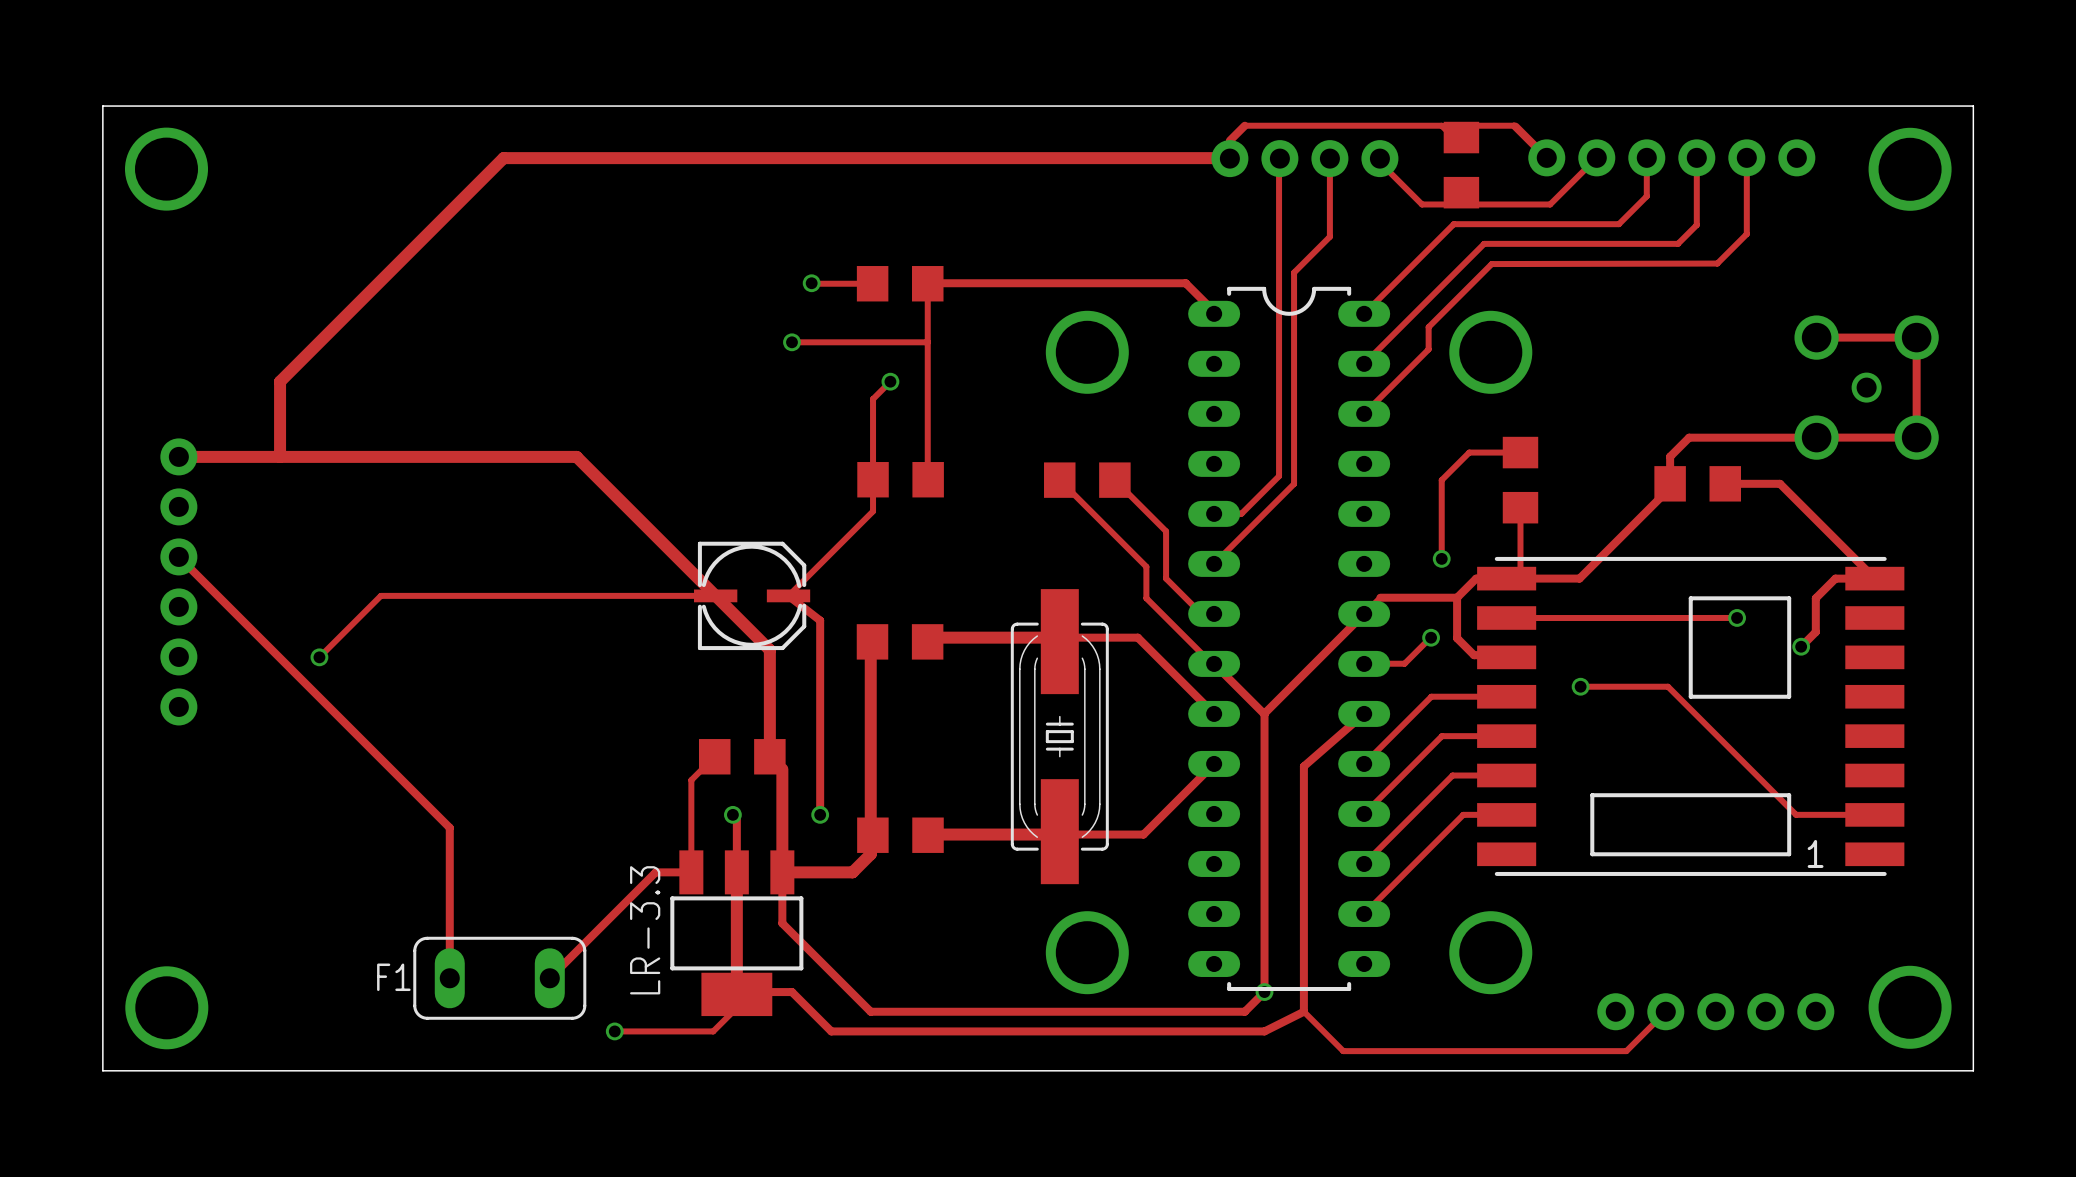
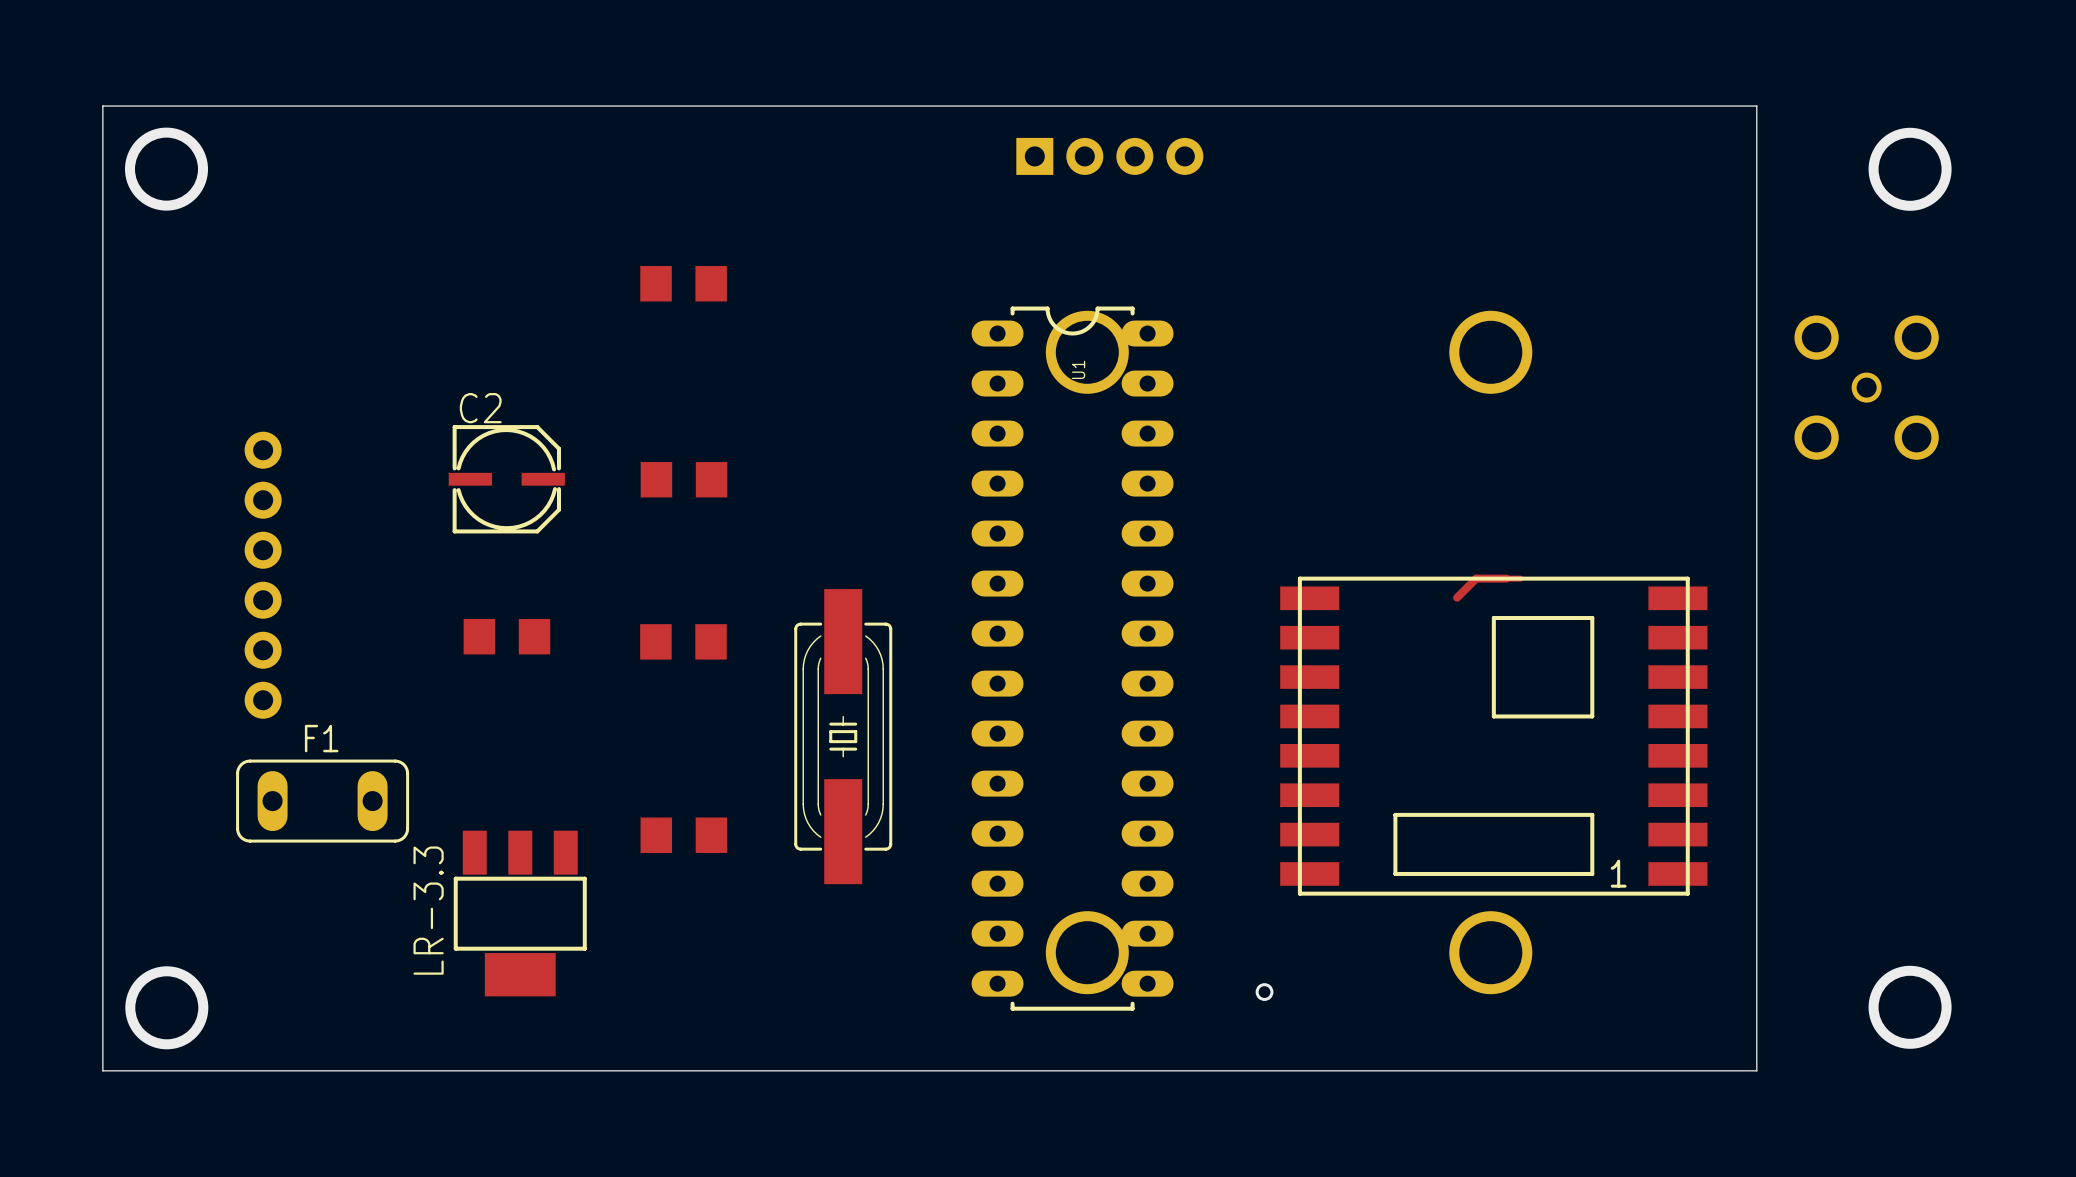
board edge: (1756, 106) (1973, 106) (1973, 1070) (1756, 1070) -> (1756, 106) (1756, 1070)
track: (1513, 125) (1514, 126) (1515, 126) (1546, 157) (1514, 125) (1461, 125) (1461, 137) (1453, 137) (1441, 125) (1244, 125) (1229, 140) -> none
track: (1229, 140) (1230, 158) (503, 158) (280, 381) (280, 456) -> none
part: none -> (1109, 156)
track: (1596, 157) (1550, 204) (1422, 204) (1379, 162) (1379, 158) -> none
track: (1646, 157) (1646, 196) (1618, 224) (1453, 224) (1364, 313) -> none
part: (1671, 157) -> none
track: (1696, 157) (1696, 225) (1678, 243) (1484, 243) (1364, 363) -> none
track: (1746, 157) (1746, 234) (1717, 263) (1491, 264) (1428, 327) (1428, 349) (1364, 413) -> none
track: (1279, 158) (1279, 476) (1241, 513) (1214, 513) -> none
part: (1304, 158) -> none
track: (1329, 158) (1329, 236) (1294, 272) (1294, 483) (1214, 563) -> none
part: (1461, 165) -> none
part: none -> (683, 283)
track: (811, 283) (872, 283) -> none
via: (811, 283) -> none
part: (900, 283) -> none
track: (1214, 313) (1214, 311) (1185, 283) (928, 283) (928, 479) -> none
track: (1816, 337) (1916, 337) (1916, 437) (1689, 437) (1670, 456) (1670, 488) (1579, 578) (1520, 578) (1520, 507) -> none
track: (791, 342) (927, 342) -> none
via: (791, 342) -> none
track: (890, 381) (873, 399) (873, 511) (788, 595) (820, 620) (820, 814) -> none
via: (890, 381) -> none
track: (1520, 452) (1469, 452) (1441, 480) (1441, 558) -> none
track: (178, 456) (576, 456) (769, 650) (769, 756) (782, 769) (782, 872) -> none
C2: none -> (506, 479)
part: none -> (684, 479)
part: (900, 479) -> none
track: (1059, 480) (1146, 566) (1146, 598) (1264, 714) -> none
part: (1087, 480) -> none
track: (1114, 480) (1166, 531) (1166, 578) (1201, 613) (1214, 613) -> none
part: (1520, 480) -> none
part: (1697, 483) -> none
track: (1725, 483) (1780, 483) (1874, 578) (1835, 578) (1815, 598) (1815, 632) (1801, 646) -> none
track: (178, 556) (449, 827) (449, 978) -> none
via: (1441, 558) -> none
part position: (178, 581) -> (263, 575)
track: (715, 595) (380, 595) (319, 657) -> none
part: (752, 595) -> none
via: (1737, 617) -> none
track: (1506, 618) (1737, 617) -> none
part: none -> (506, 636)
track: (1047, 637) (1137, 637) (1214, 713) -> none
track: (1047, 637) (931, 637) (927, 641) -> none
track: (1431, 637) (1404, 663) (1364, 663) -> none
via: (1431, 637) -> none
part: (1289, 638) -> none
part: none -> (683, 641)
track: (872, 641) (870, 643) (870, 854) -> none
part: (900, 641) -> none
via: (1801, 646) -> none
via: (319, 657) -> none
track: (1506, 657) (1504, 655) (1474, 655) (1457, 638) (1457, 597) (1380, 597) (1264, 714) -> none
U1: none -> (1072, 658)
track: (1580, 686) (1668, 686) (1796, 814) (1874, 814) -> none
via: (1580, 686) -> none
track: (1520, 696) (1431, 696) (1364, 763) -> none
track: (1364, 713) (1303, 766) (1303, 1011) -> none
track: (1264, 714) (1264, 992) (1244, 1011) (870, 1011) (782, 923) (782, 872) -> none
part: (1690, 716) -> none
part position: (1059, 736) -> (843, 736)
part: none -> (1493, 736)
track: (1506, 736) (1441, 736) (1364, 813) -> none
track: (714, 756) (691, 780) (691, 872) (655, 872) (549, 978) -> none
part: (742, 756) -> none
track: (1214, 763) (1143, 834) (1067, 834) -> none
track: (1506, 775) (1452, 775) (1364, 863) -> none
track: (732, 814) (736, 818) (736, 994) -> none
via: (732, 814) -> none
via: (820, 814) -> none
track: (1520, 814) (1463, 814) (1364, 913) -> none
track: (1067, 834) (928, 835) -> none
part: none -> (683, 835)
part: (900, 835) -> none
track: (870, 854) (852, 872) (782, 872) -> none
LR-3.3 position: (736, 933) -> (520, 913)
F1 name position: F1 (393, 977) -> F1 (321, 738)
F1 position: (499, 978) -> (322, 801)
track: (736, 994) (732, 992) (791, 992) (831, 1031) (1264, 1031) (1303, 1011) -> none
track: (736, 994) (736, 1007) (713, 1031) (614, 1031) -> none
track: (1303, 1011) (1343, 1051) (1626, 1051) (1665, 1011) -> none
part: (1715, 1011) -> none
via: (614, 1031) -> none

